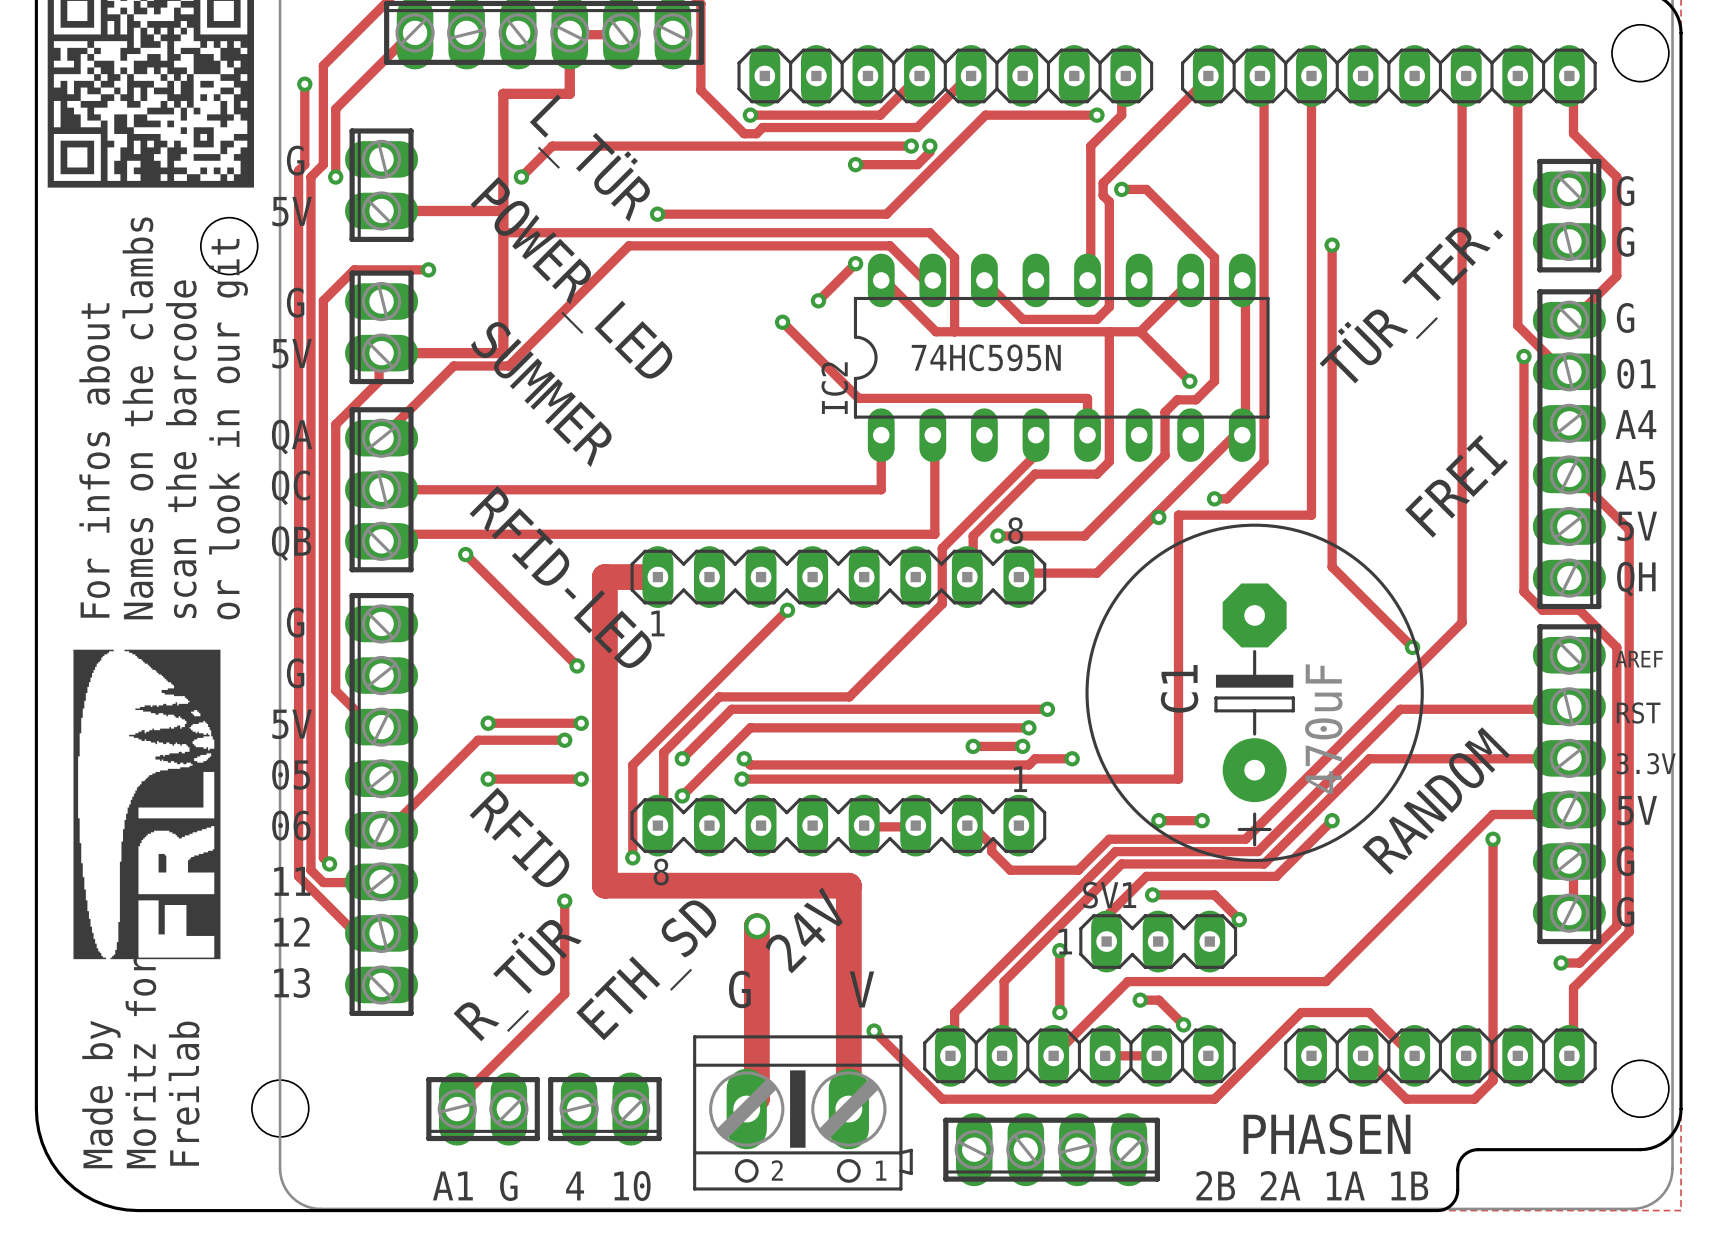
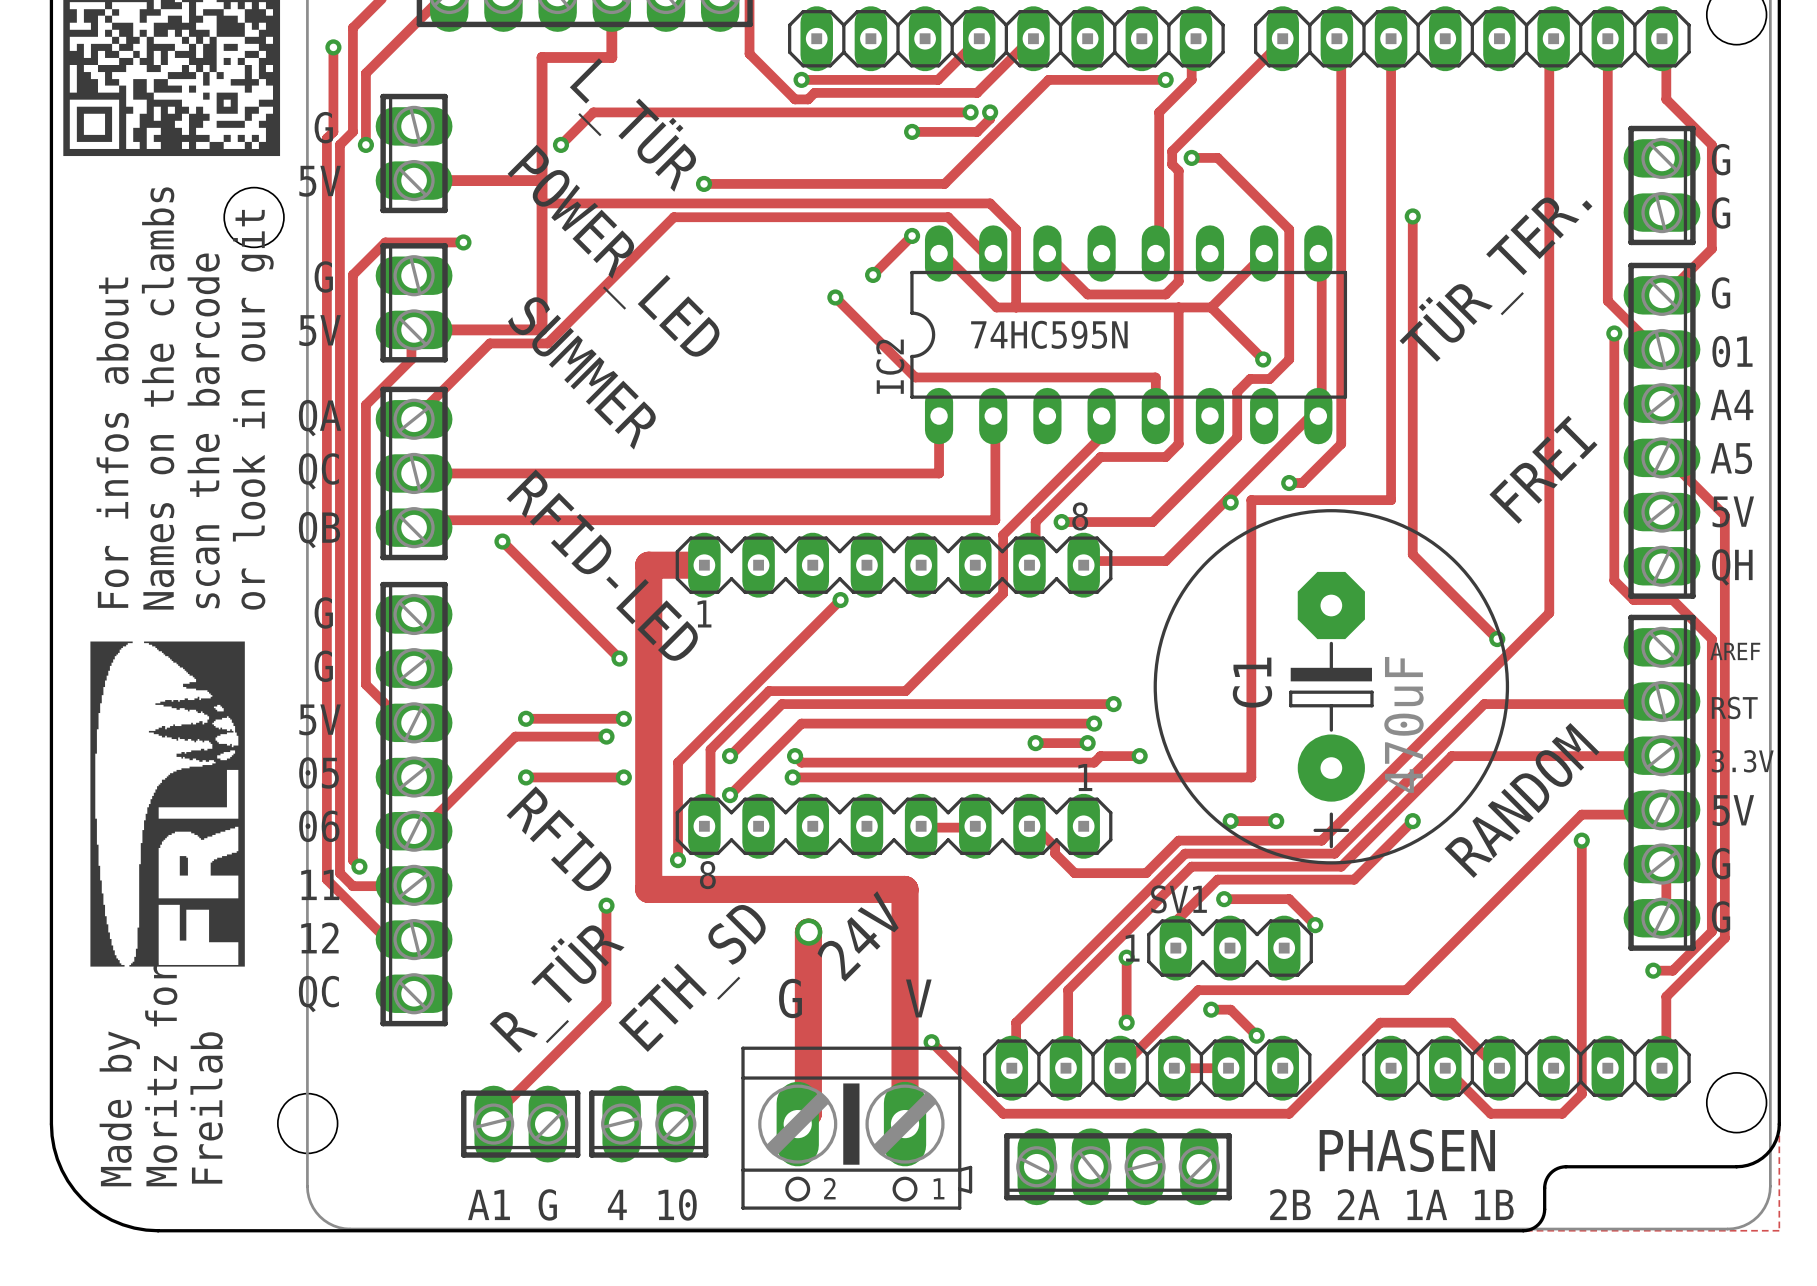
text: 13 (292, 982) -> QC (318, 994)

